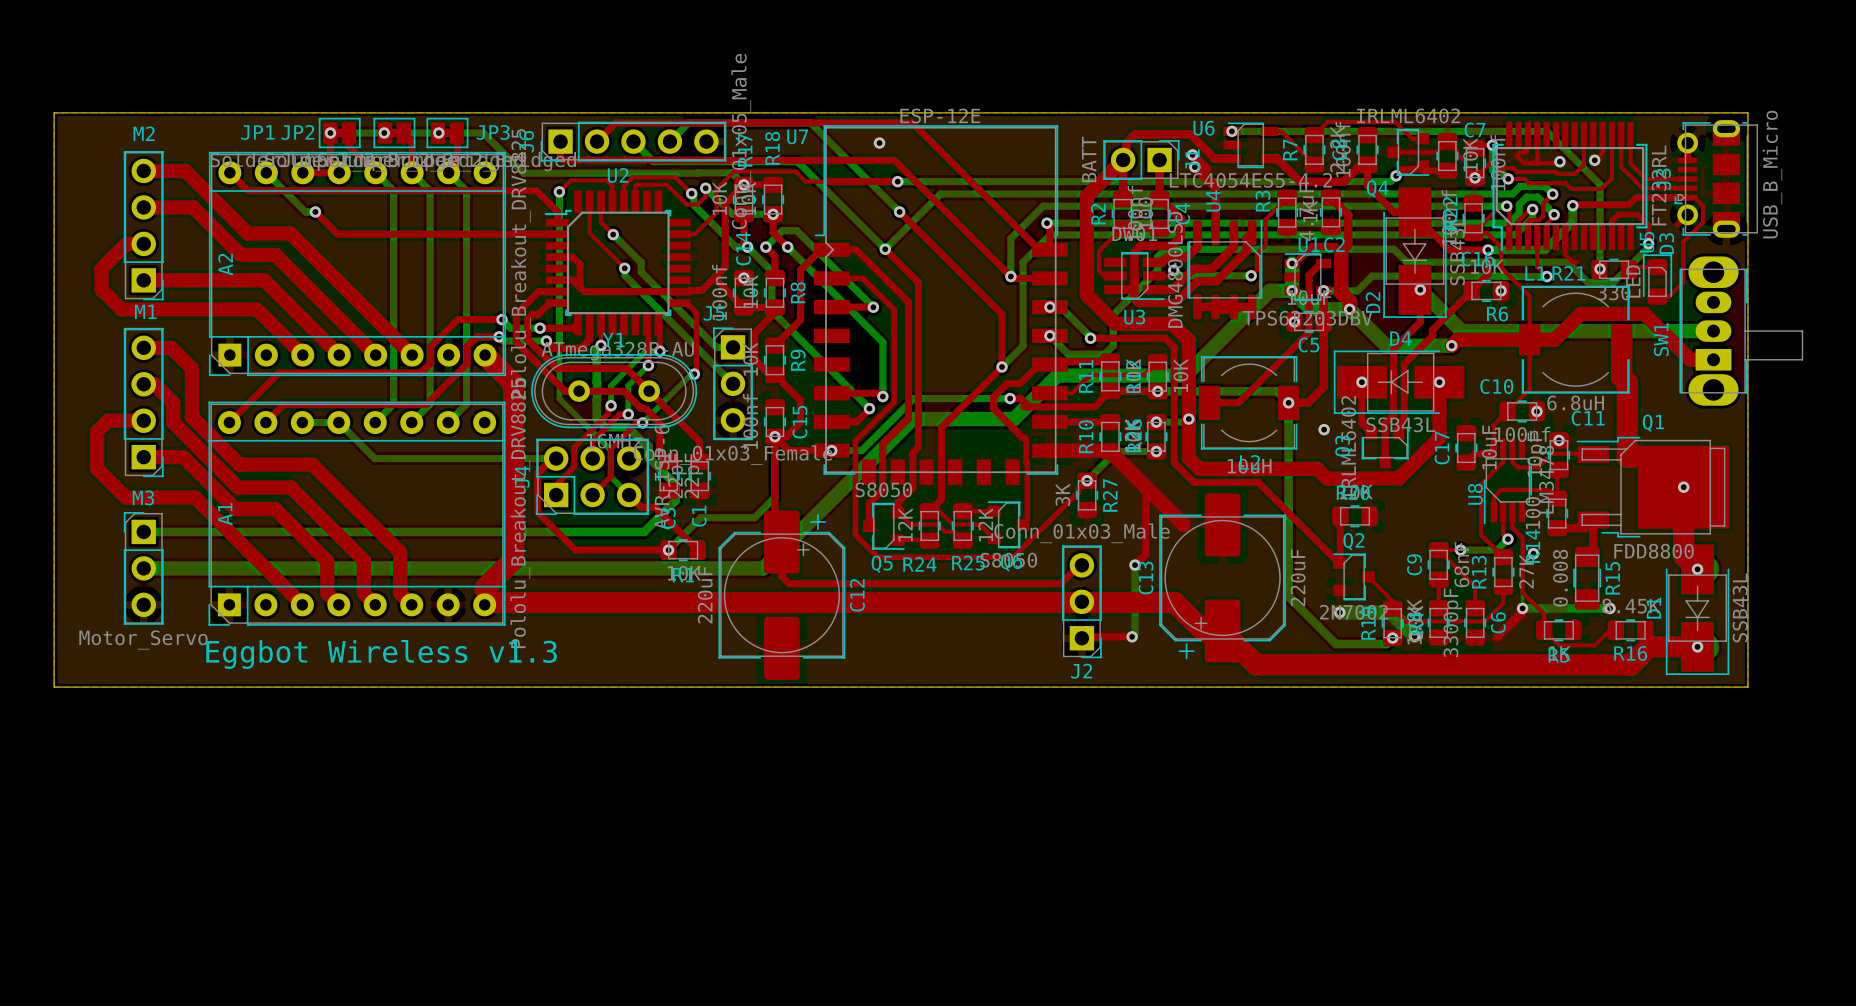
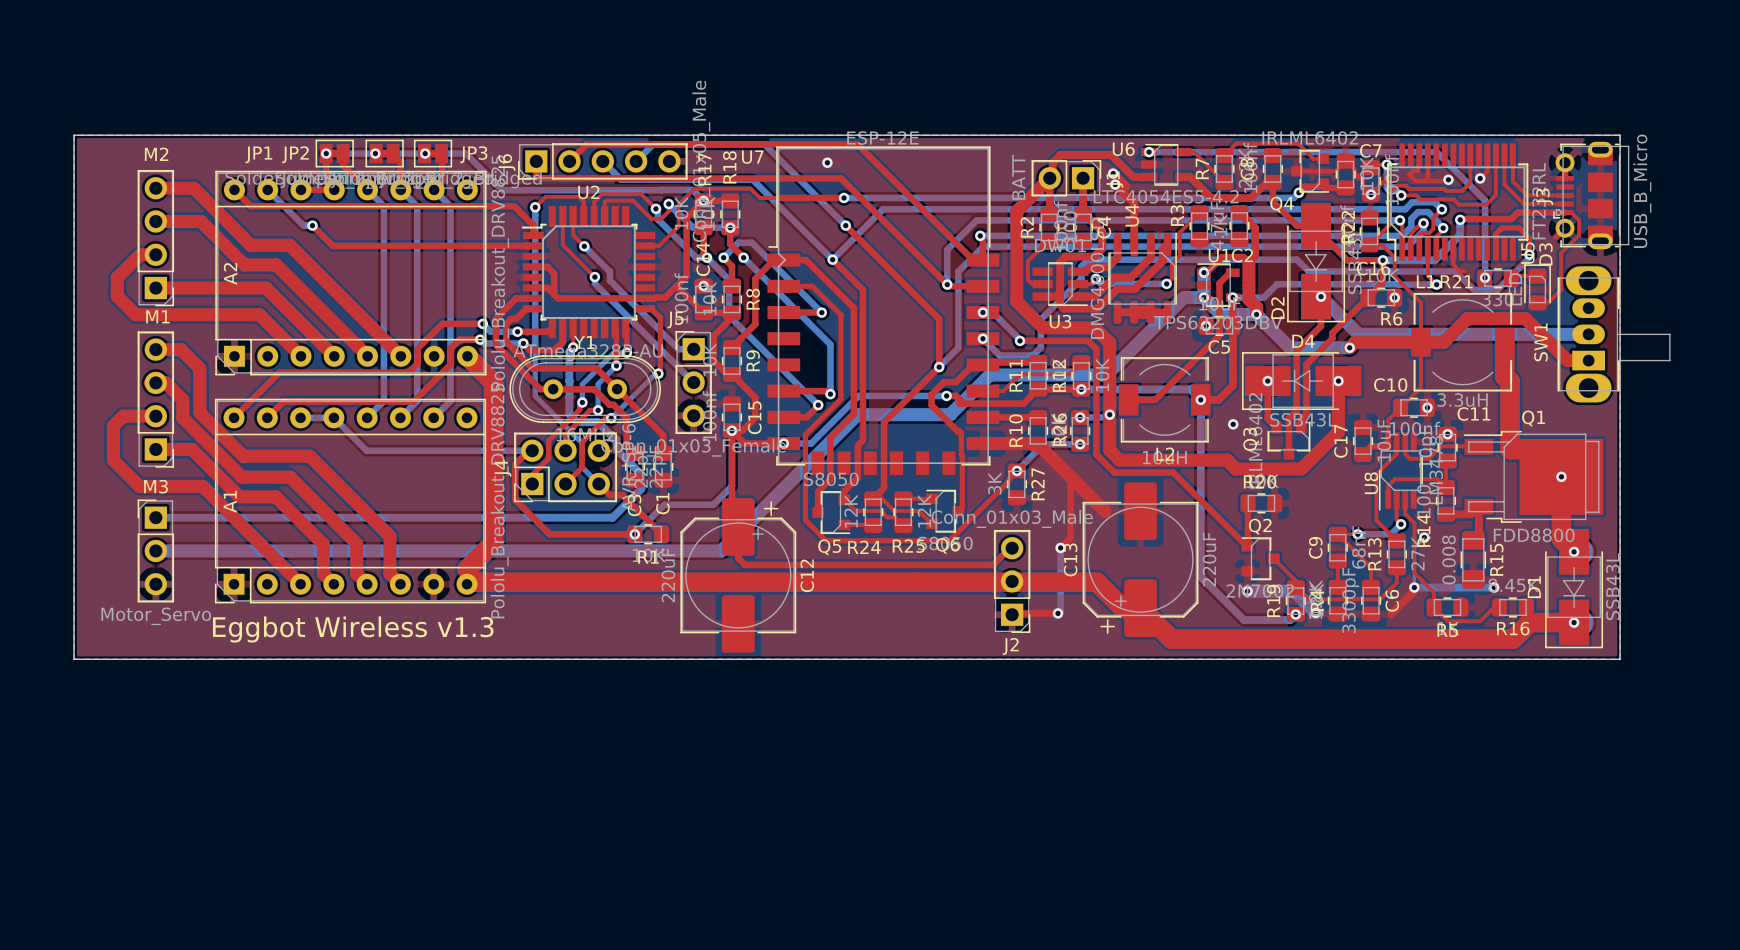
L1 value: 6.8uH (1575, 403) -> 3.3uH (1462, 400)

